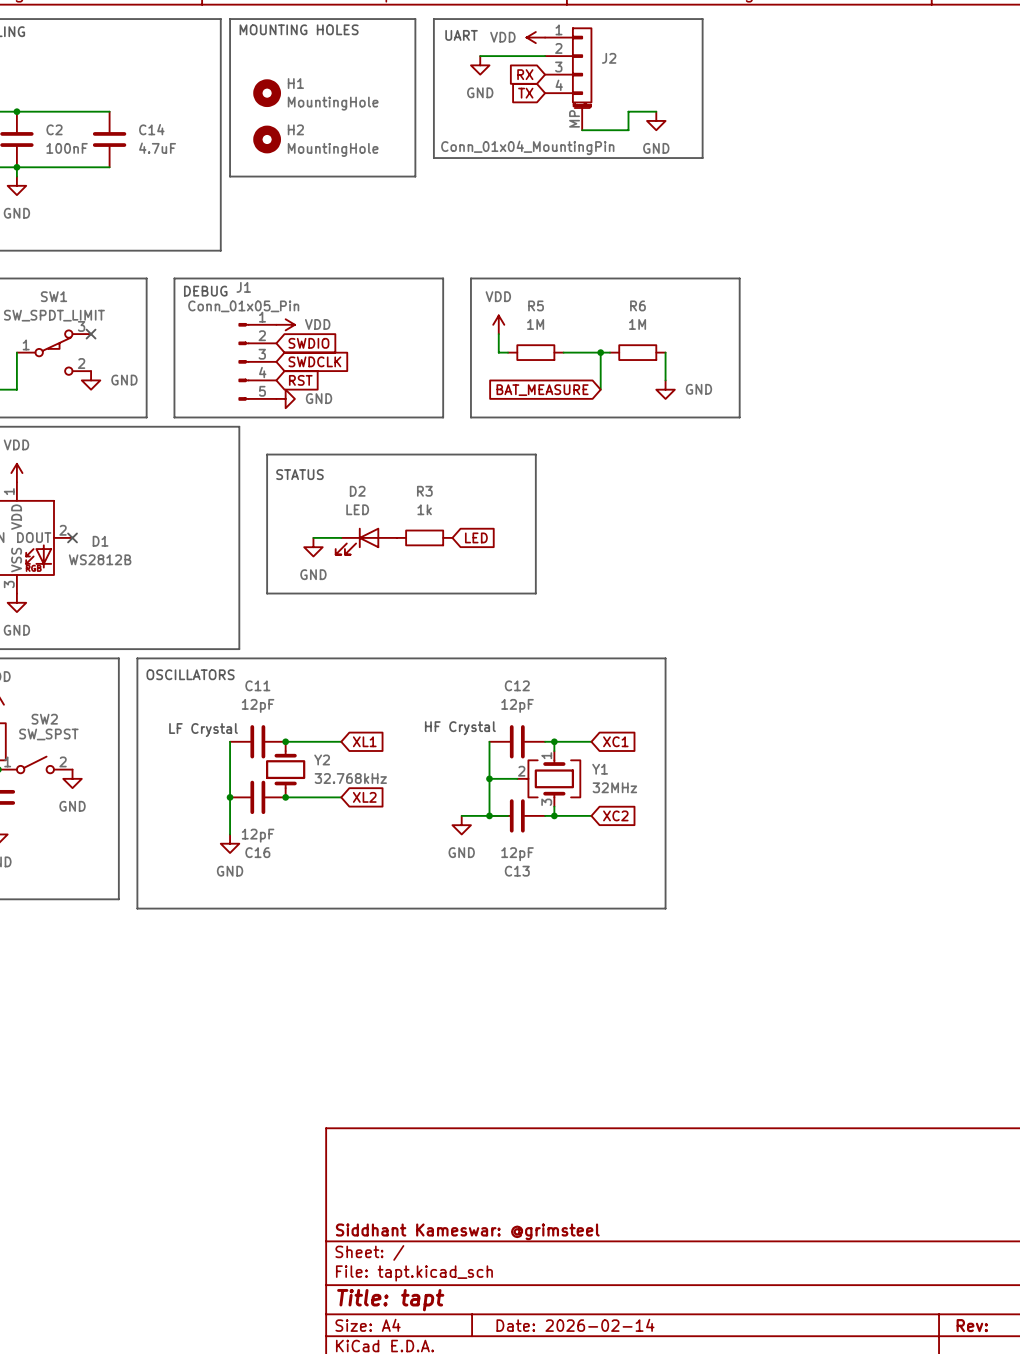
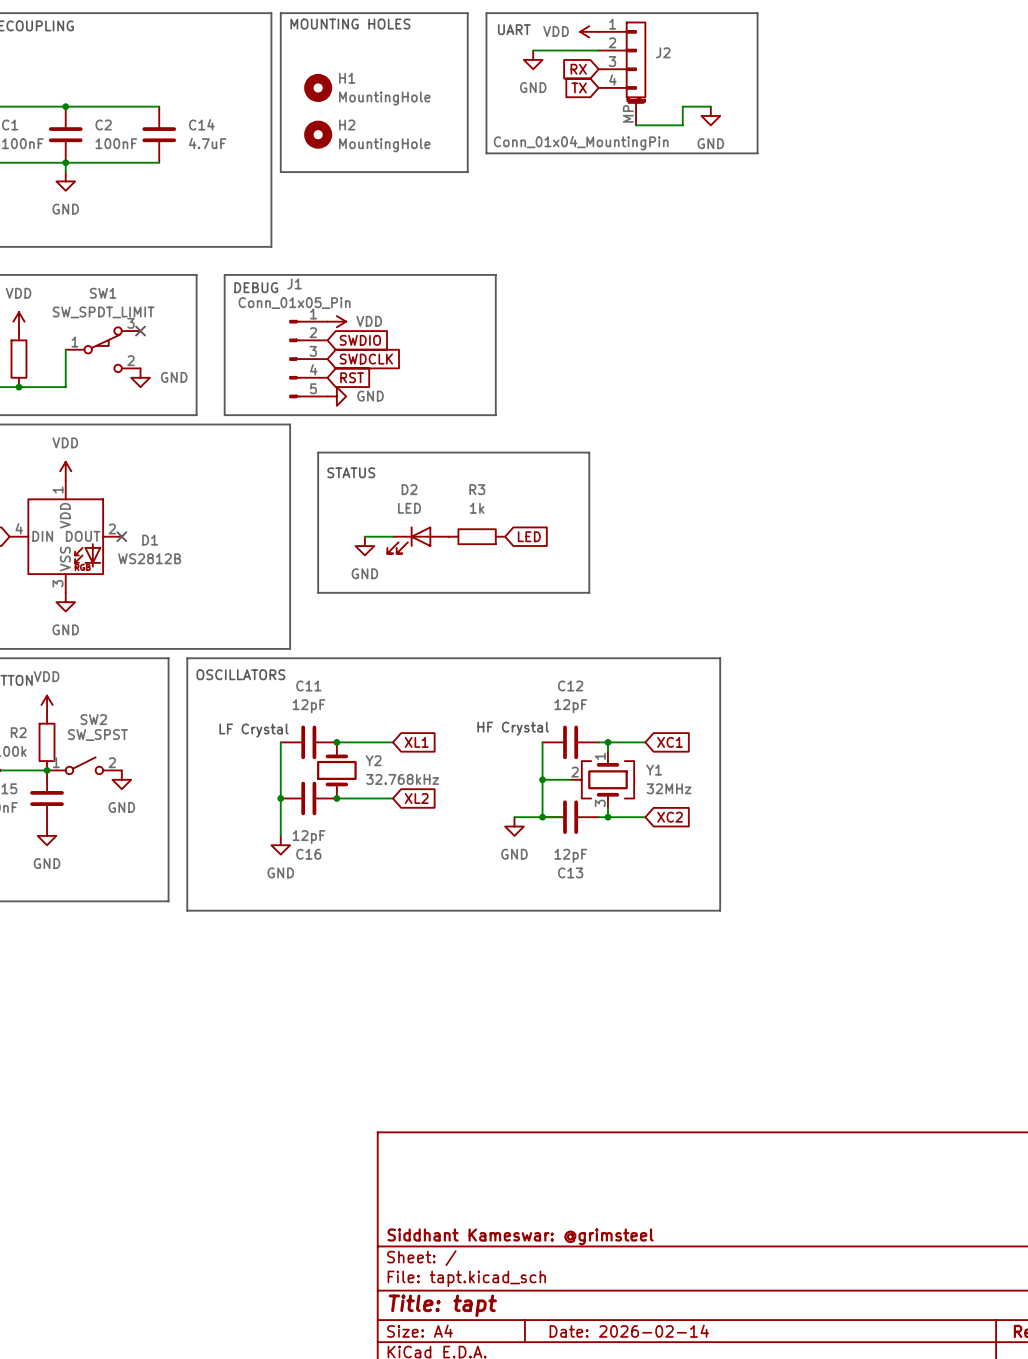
line: (470, 278) (739, 278) (739, 417) (470, 417) (470, 278) -> none
power symbol: VDD (498, 324) -> none
wire: (498, 334) (498, 352) (508, 352) -> none
R5: 1M (535, 352) -> none
wire: (563, 352) (609, 352) -> none
wire: (600, 352) (600, 389) -> none
junction: (600, 352) -> none
R6: 1M (637, 352) -> none
wire: (665, 352) (665, 380) -> none
power symbol: GND (665, 389) -> none
global label: BAT_MEASURE (542, 390) -> none

